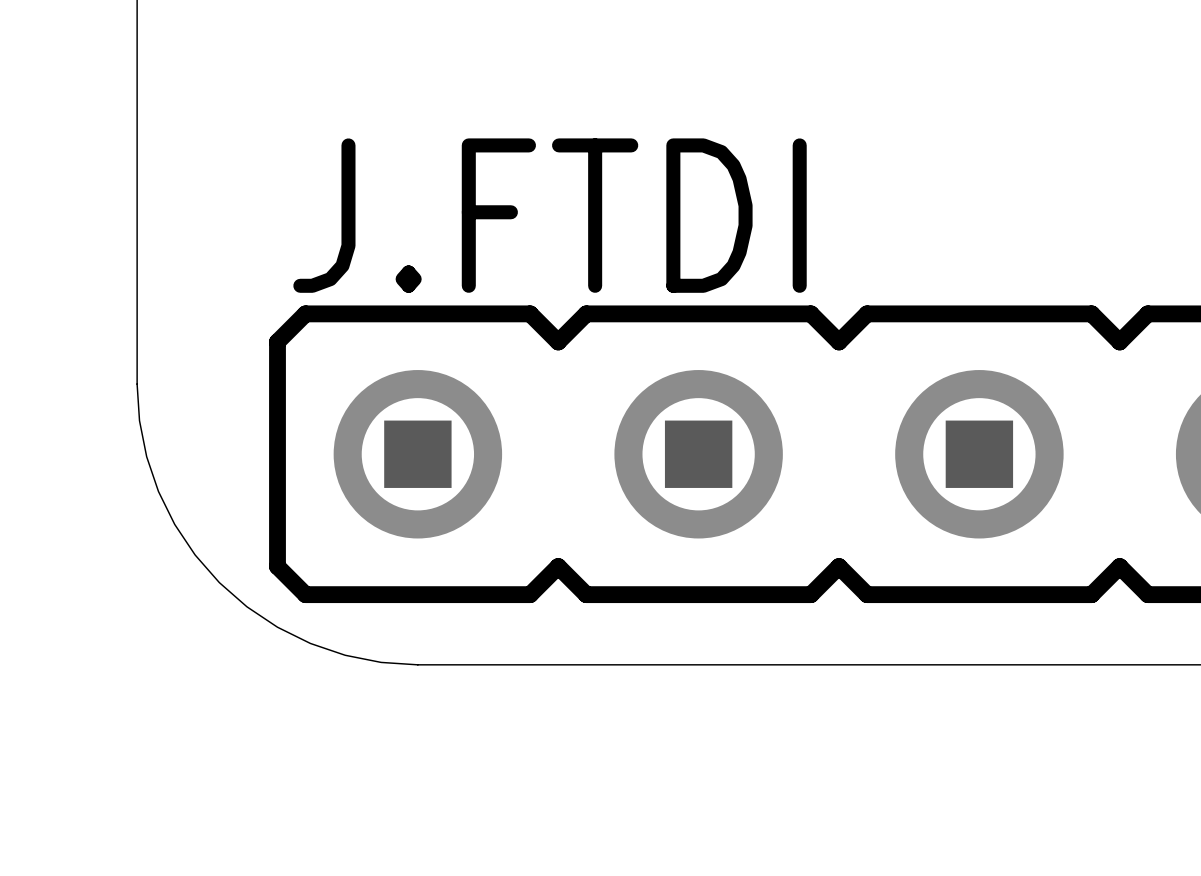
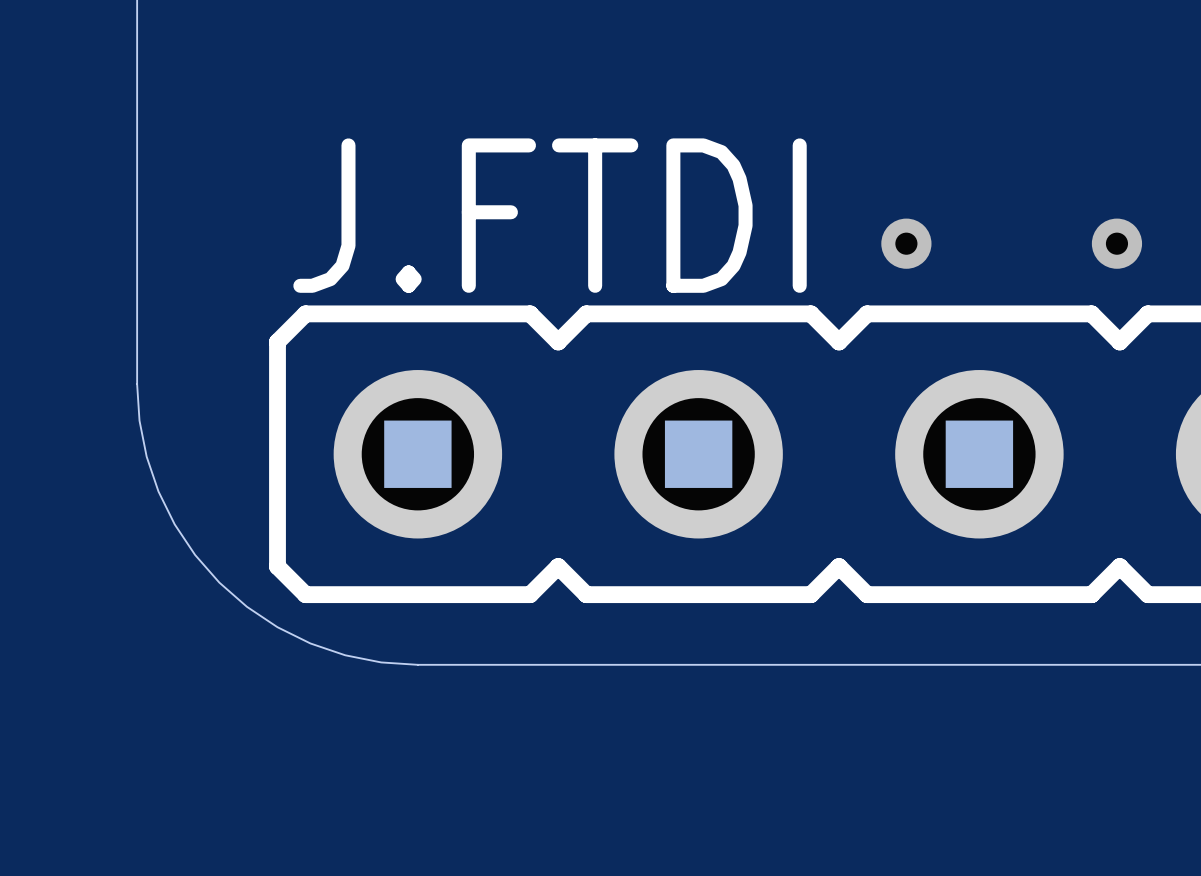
via: none -> (906, 243)
via: none -> (1116, 243)

